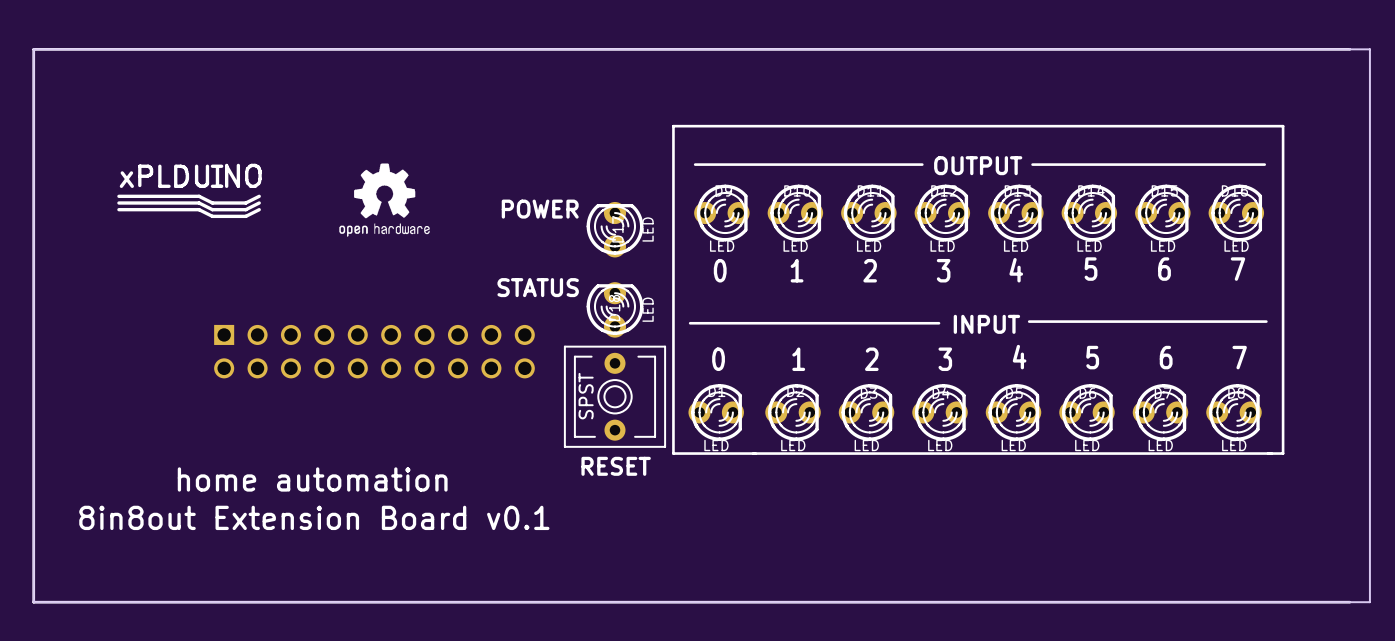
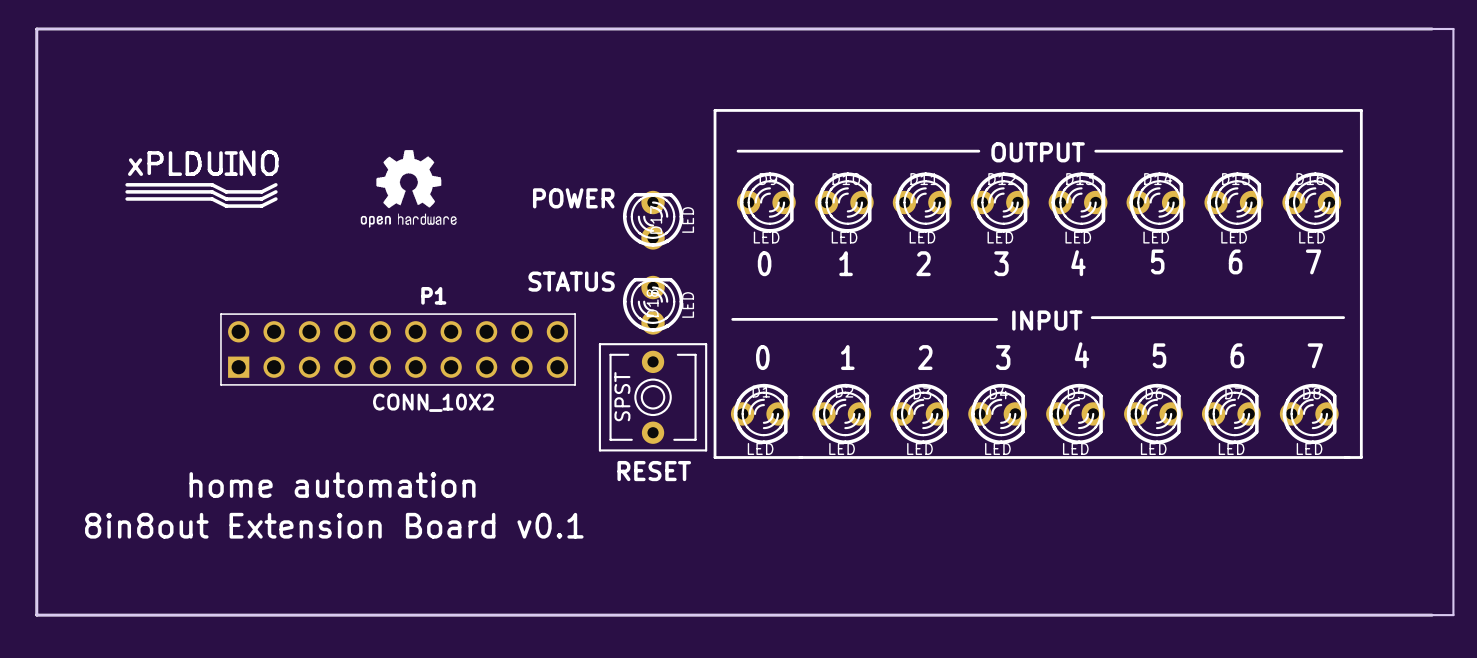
P1 side: bottom (374, 351) -> top (398, 349)

